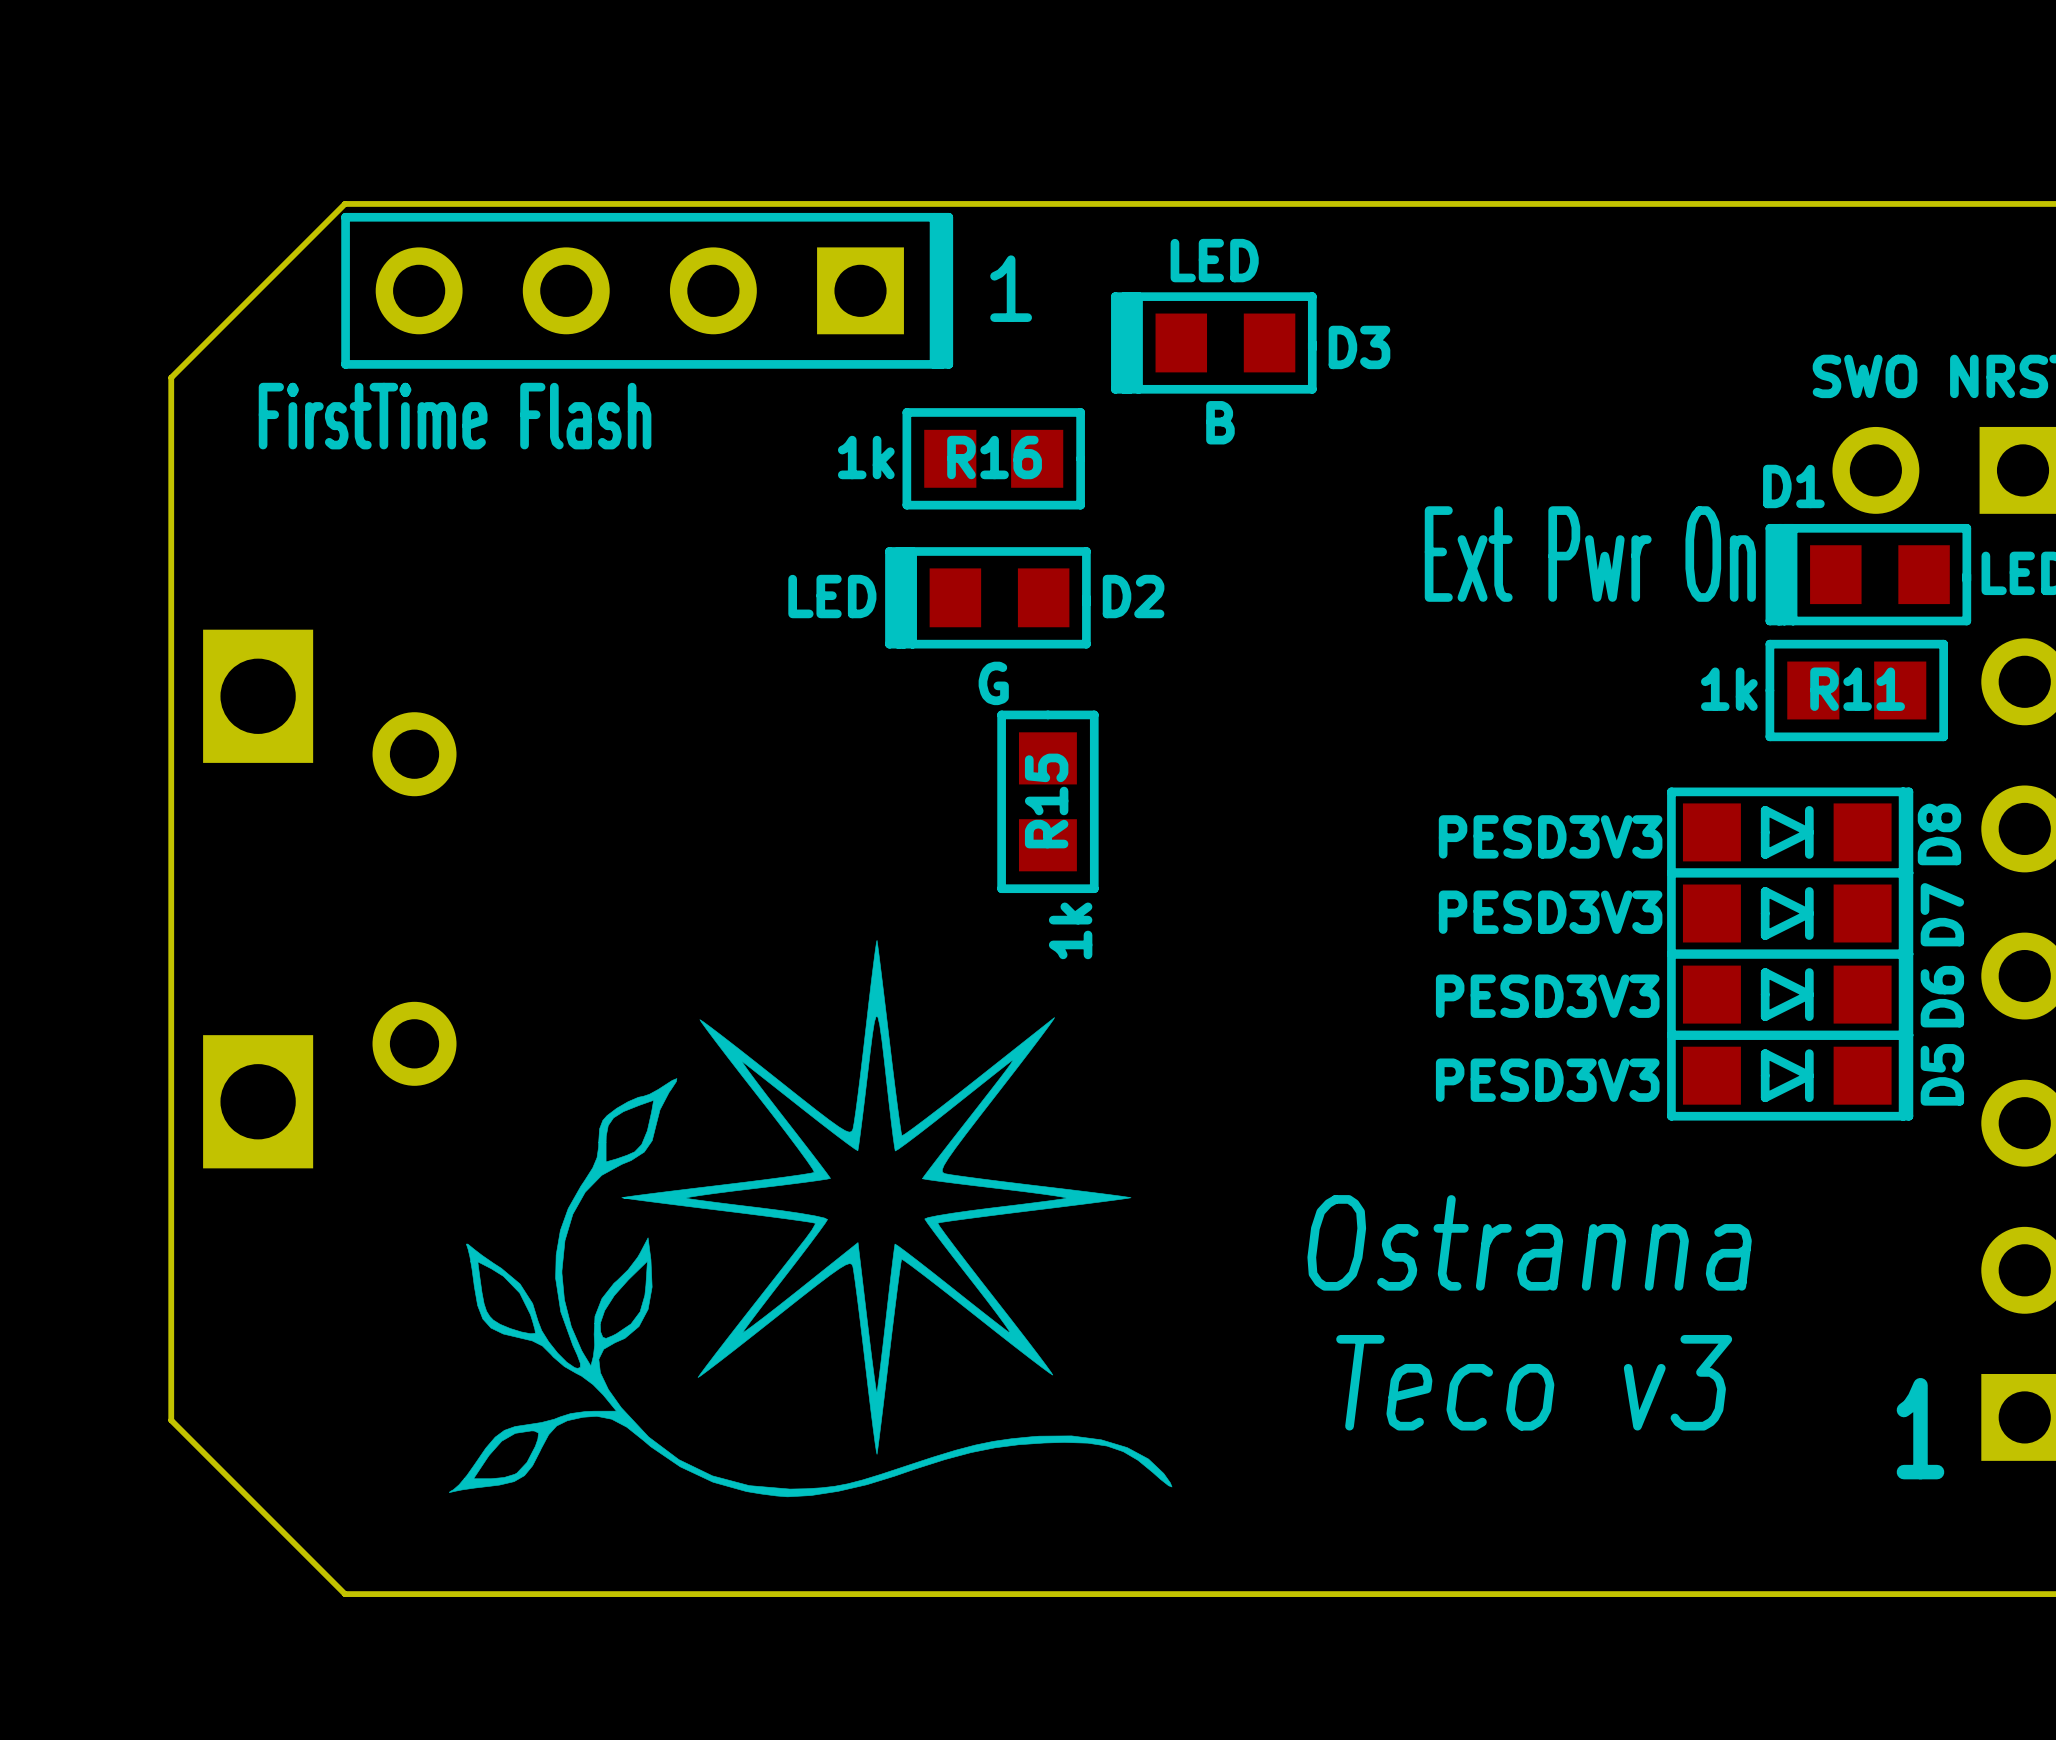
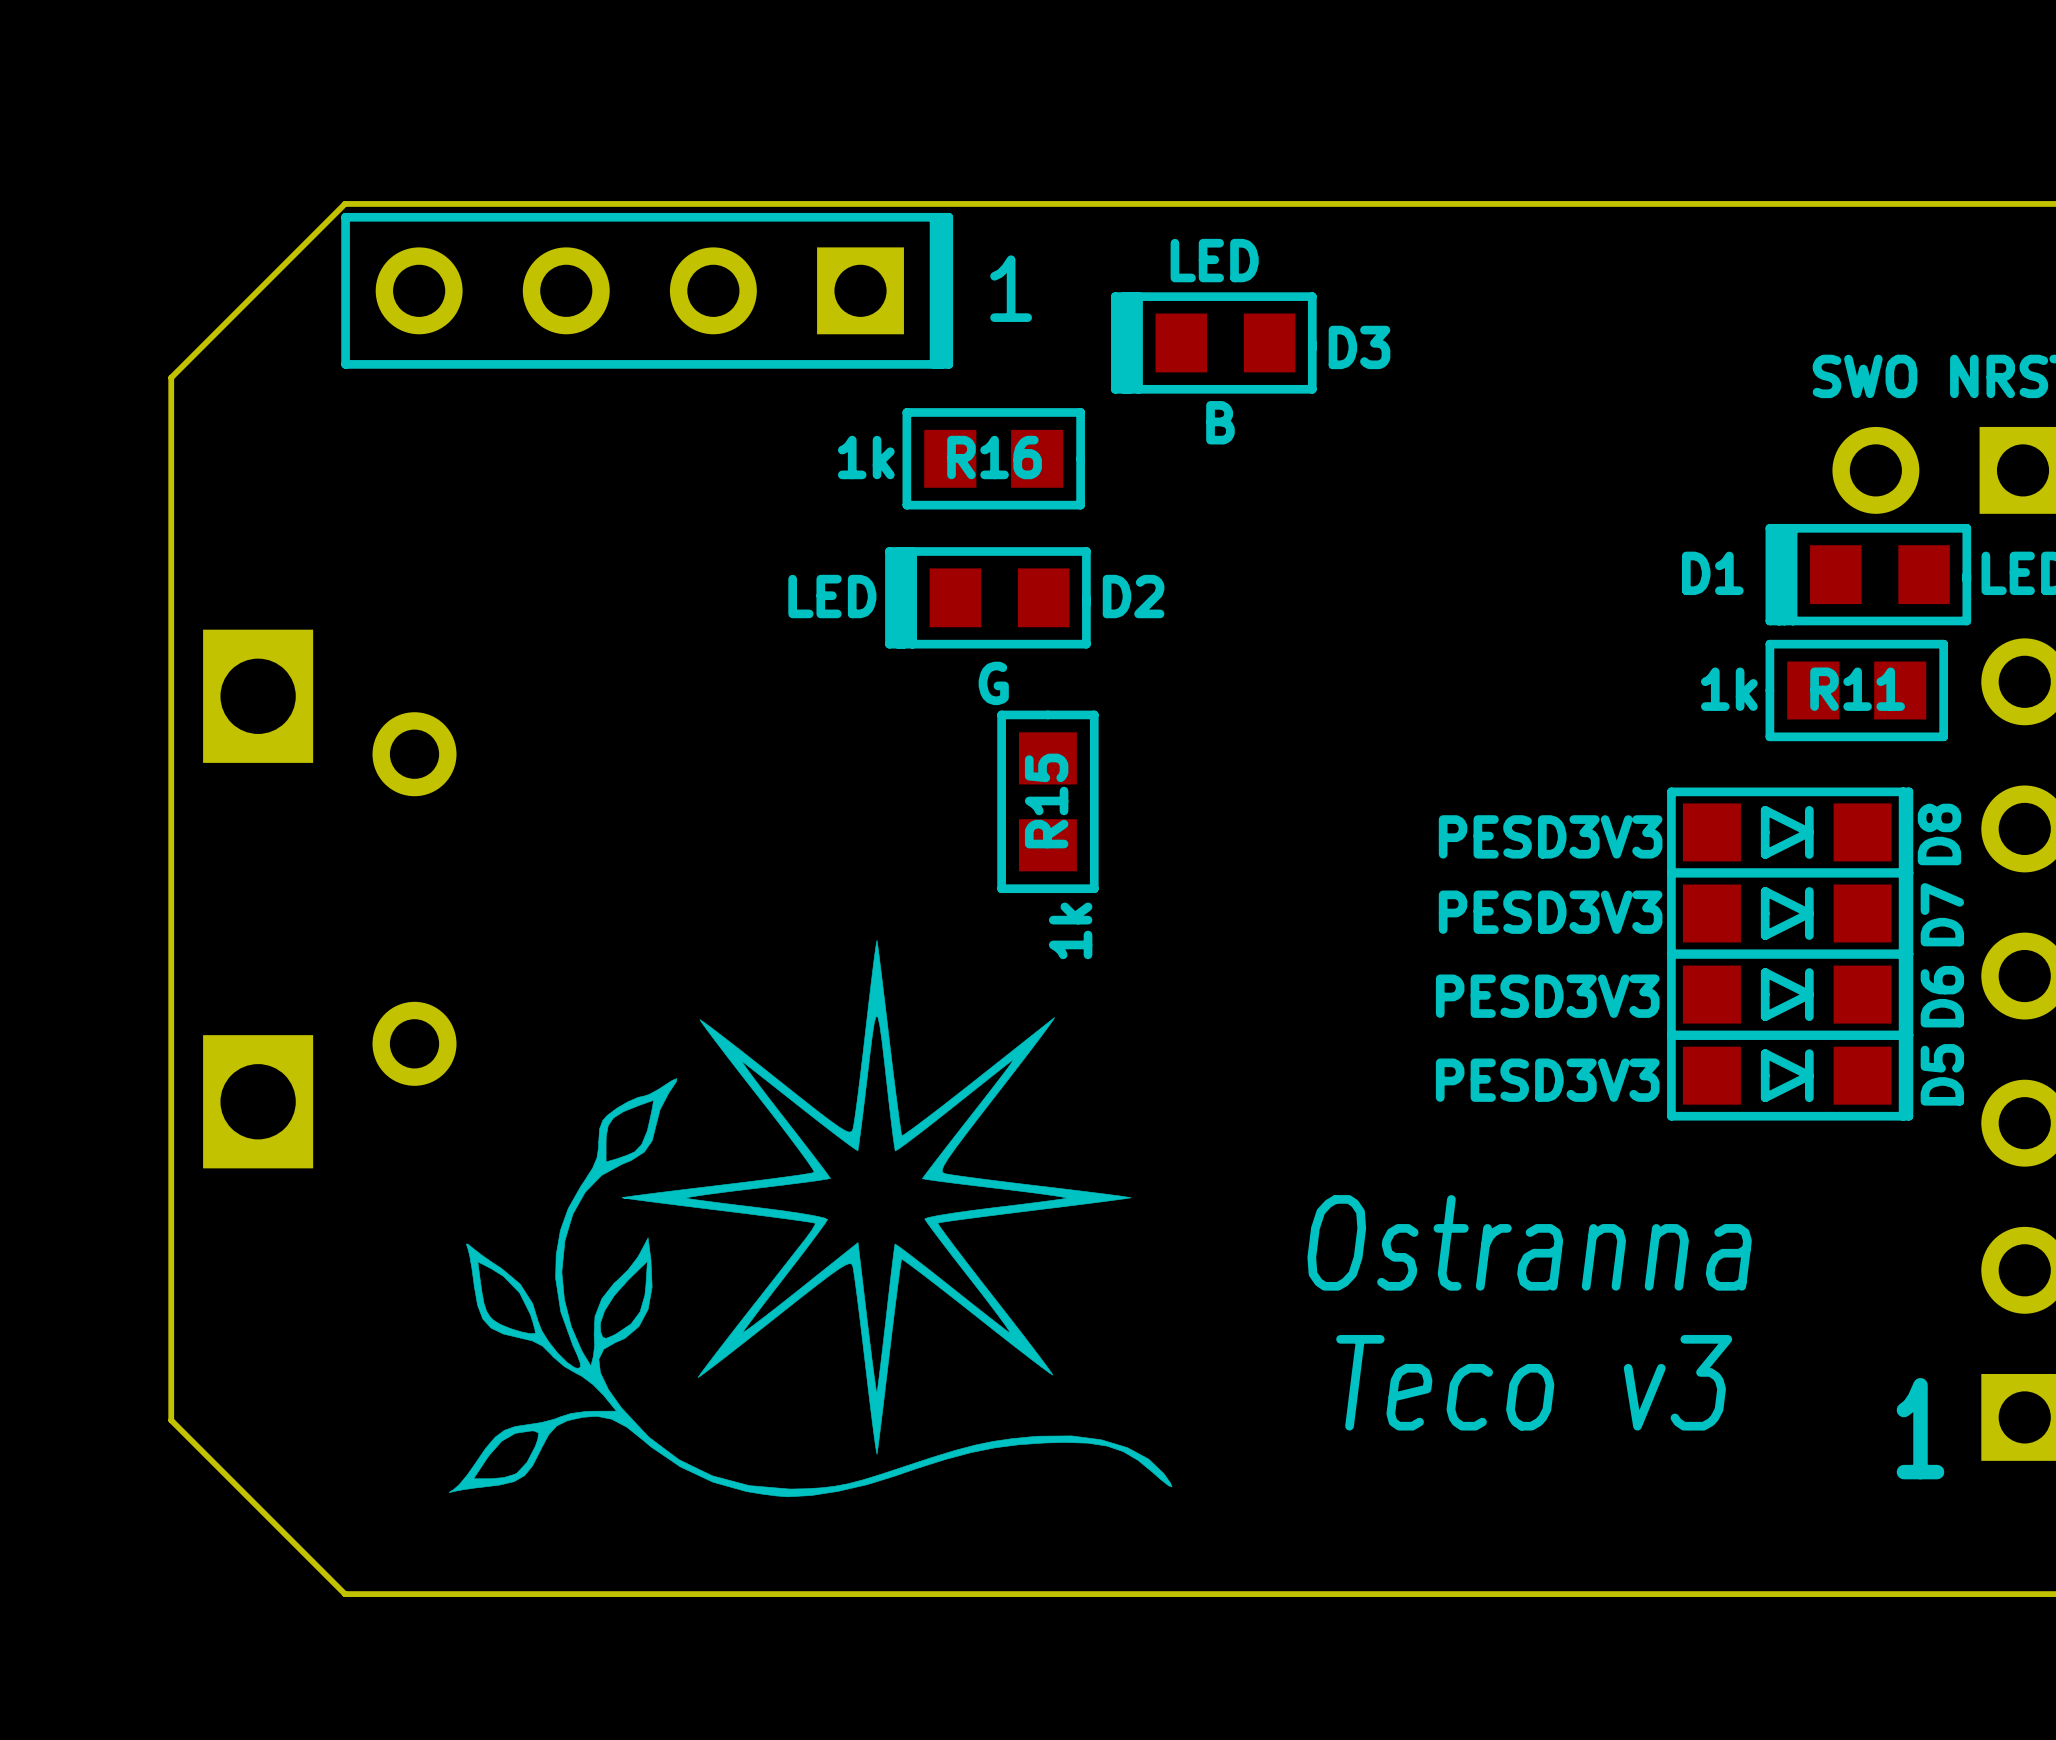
text: FirstTime Flash (455, 416) -> none
D1 name position: D1 (1793, 486) -> D1 (1712, 573)
text: Ext Pwr On (1590, 554) -> none

